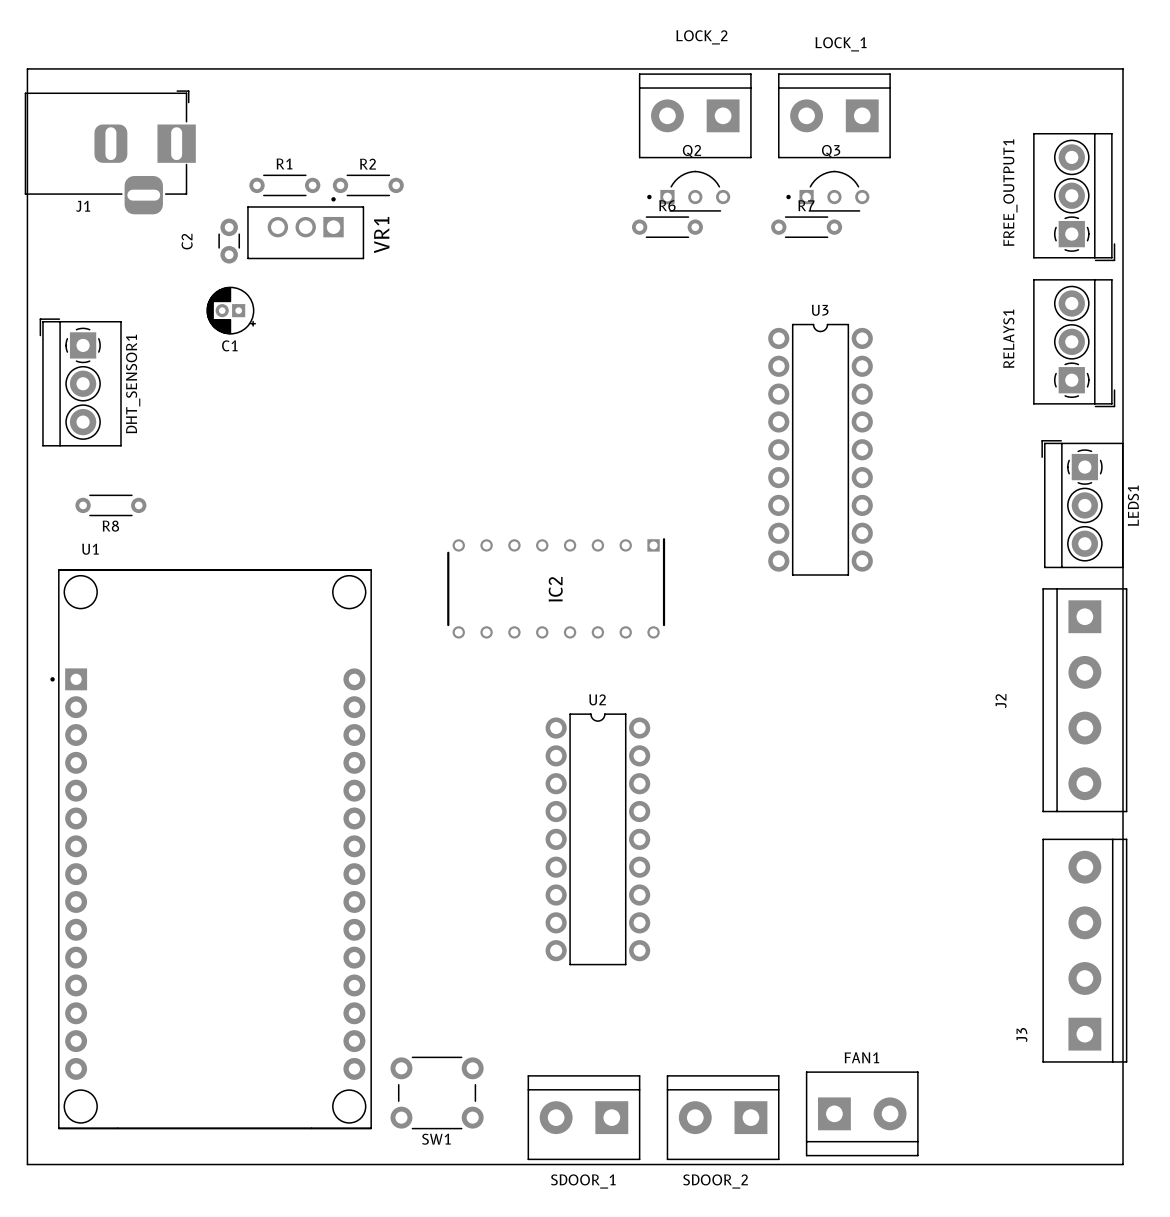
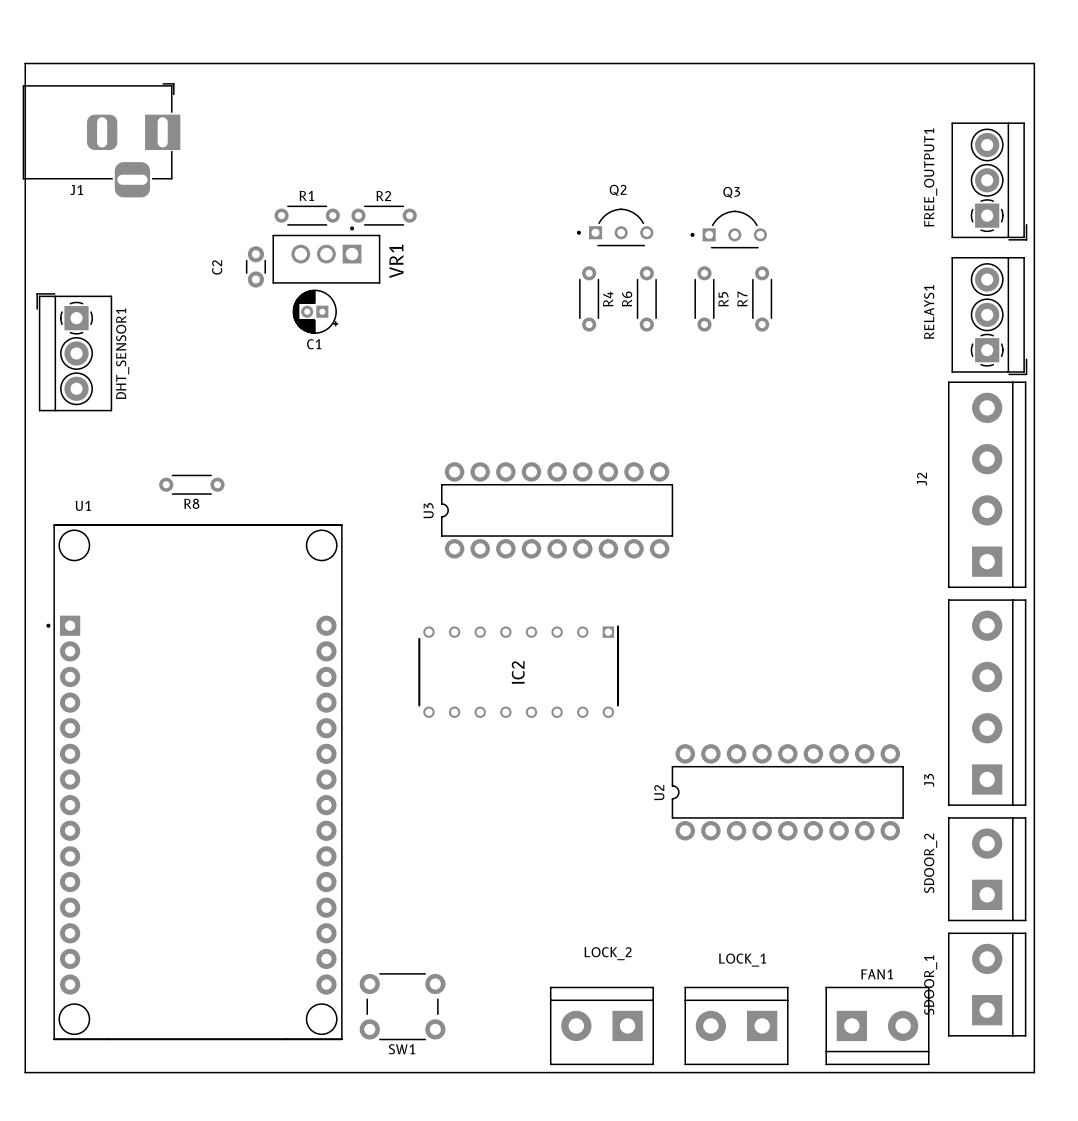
LOCK_2 position: (695, 115) -> (601, 1025)
LOCK_1 position: (834, 115) -> (736, 1025)
R1 position: (284, 185) -> (307, 215)
R2 position: (368, 185) -> (384, 215)
Q2 position: (688, 191) -> (615, 227)
Q3 position: (827, 191) -> (728, 229)
R6 name position: R6 (667, 205) -> R6 (627, 298)
R7 name position: R7 (806, 205) -> R7 (742, 299)
R6 rotation: 0° (667, 227) -> 90° clockwise (646, 298)
R6 position: (667, 227) -> (646, 298)
R7 rotation: 0° (806, 227) -> 90° clockwise (762, 298)
R7 position: (806, 227) -> (762, 298)
VR1 position: (305, 228) -> (326, 255)
C2 position: (229, 241) -> (255, 266)
C1 position: (231, 310) -> (315, 311)
R4: none -> (589, 298)
R5: none -> (704, 298)
U3 rotation: 0° (820, 449) -> 90° counterclockwise (557, 510)
U3 position: (820, 449) -> (557, 510)
LEDS1: (1082, 504) -> none
R8 position: (110, 505) -> (191, 484)
IC2 position: (556, 588) -> (518, 671)
J2 rotation: 0° (1084, 700) -> 180° (987, 484)
J2 position: (1084, 700) -> (987, 484)
U2 rotation: 0° (597, 839) -> 90° counterclockwise (787, 792)
U2 position: (597, 839) -> (787, 792)
J3 position: (1084, 950) -> (987, 702)
FAN1 position: (862, 1113) -> (877, 1025)
SDOOR_1 rotation: 0° (583, 1117) -> 90° clockwise (987, 984)
SDOOR_1 position: (583, 1117) -> (987, 984)
SDOOR_2 rotation: 0° (723, 1117) -> 90° clockwise (987, 869)
SDOOR_2 position: (723, 1117) -> (987, 869)

